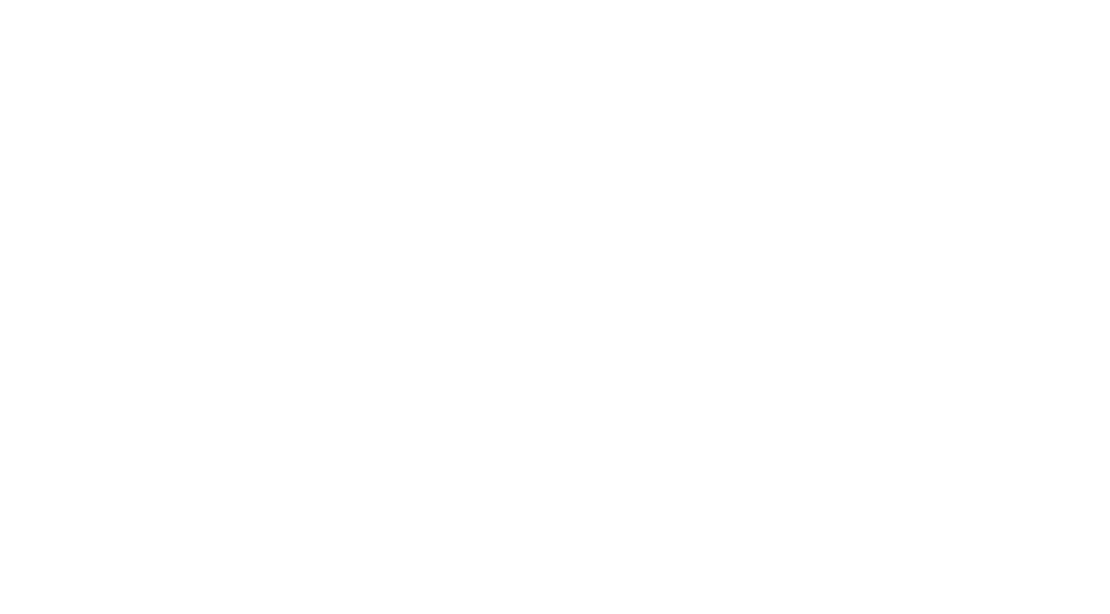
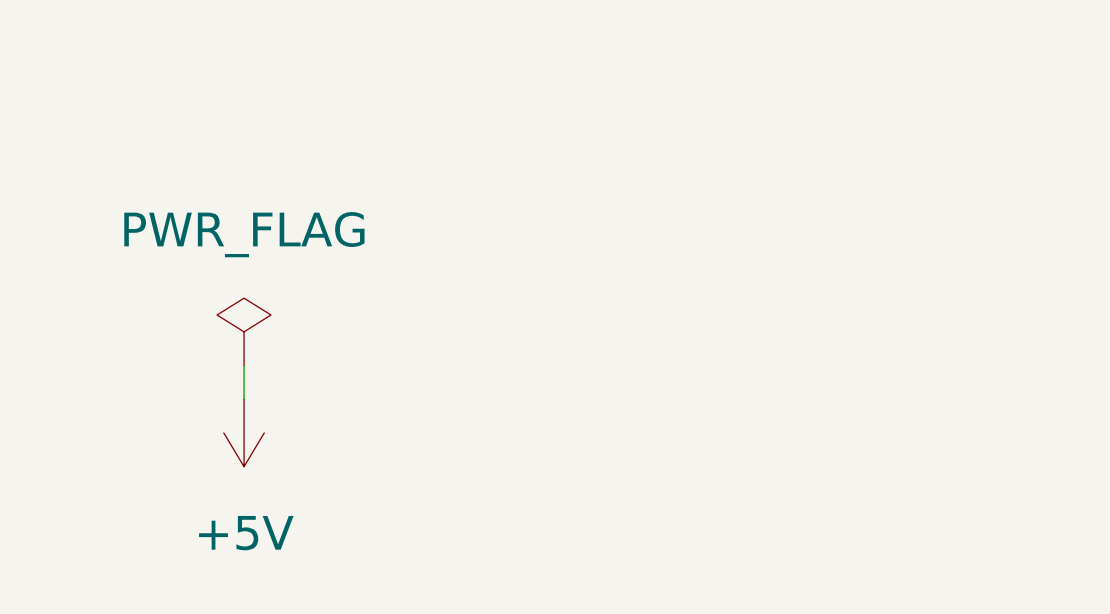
power symbol: none -> PWR_FLAG (244, 331)
wire: none -> (244, 365) (244, 399)
power symbol: none -> +5V (244, 432)

